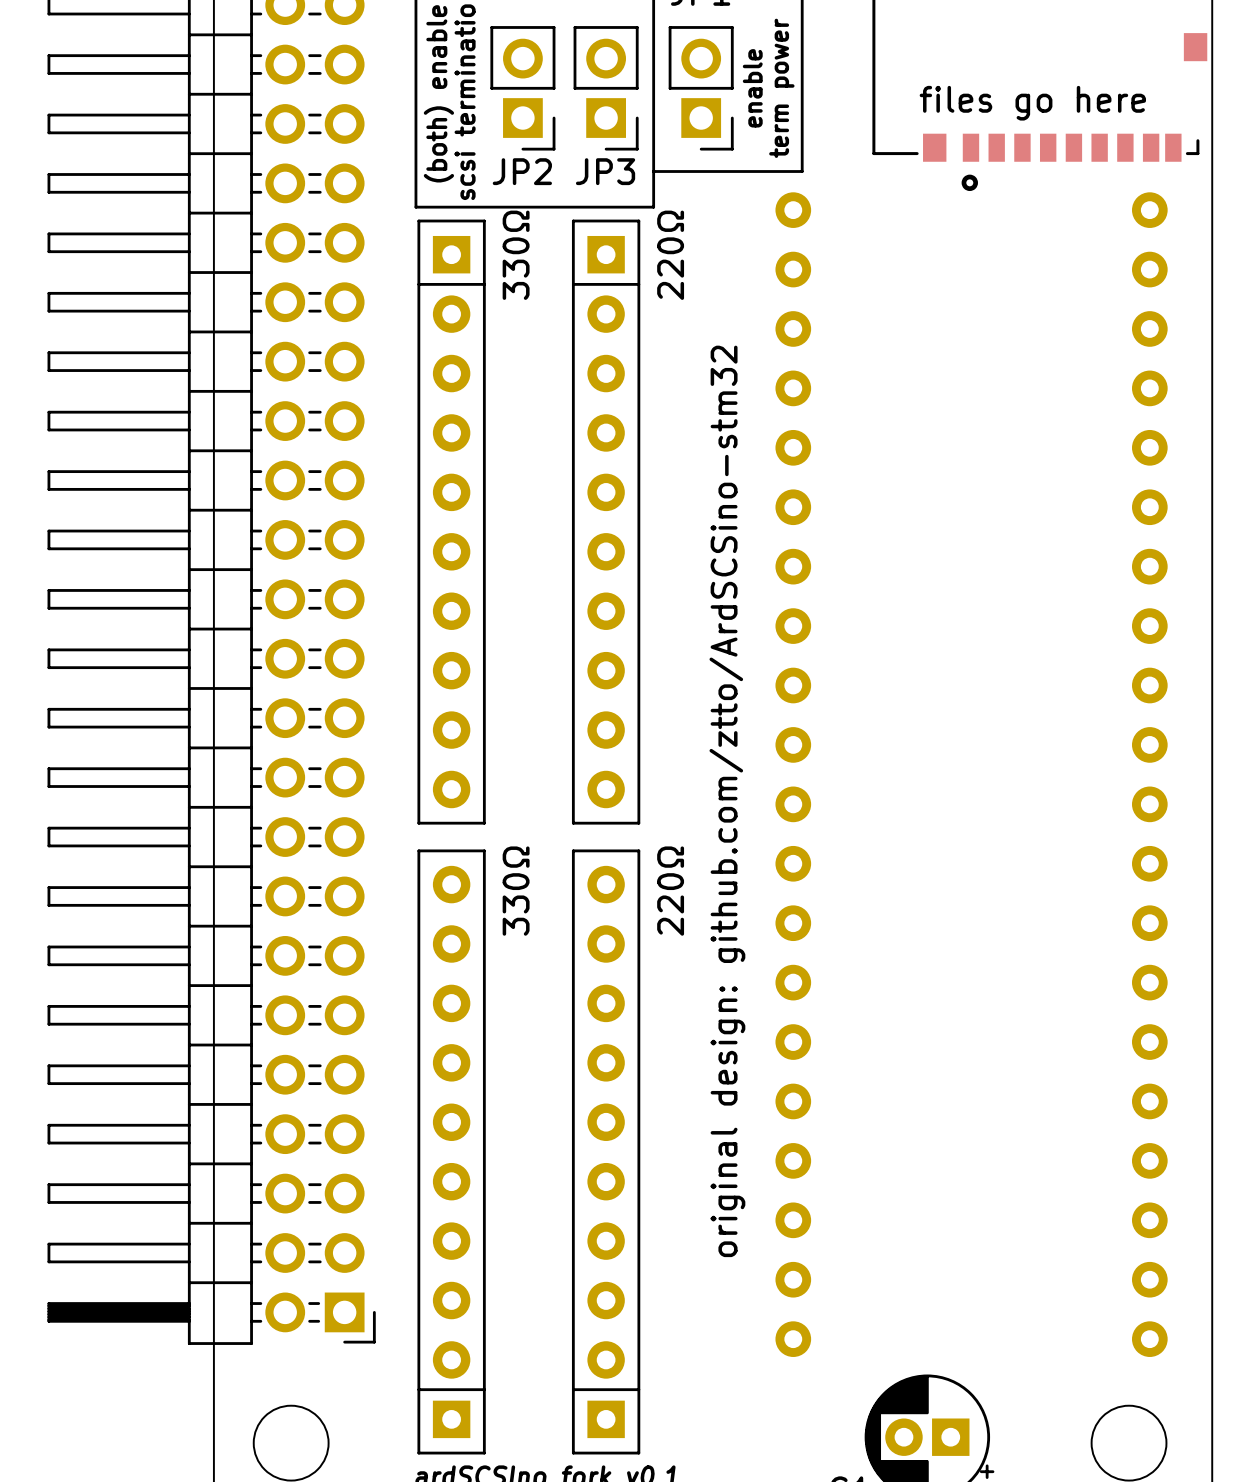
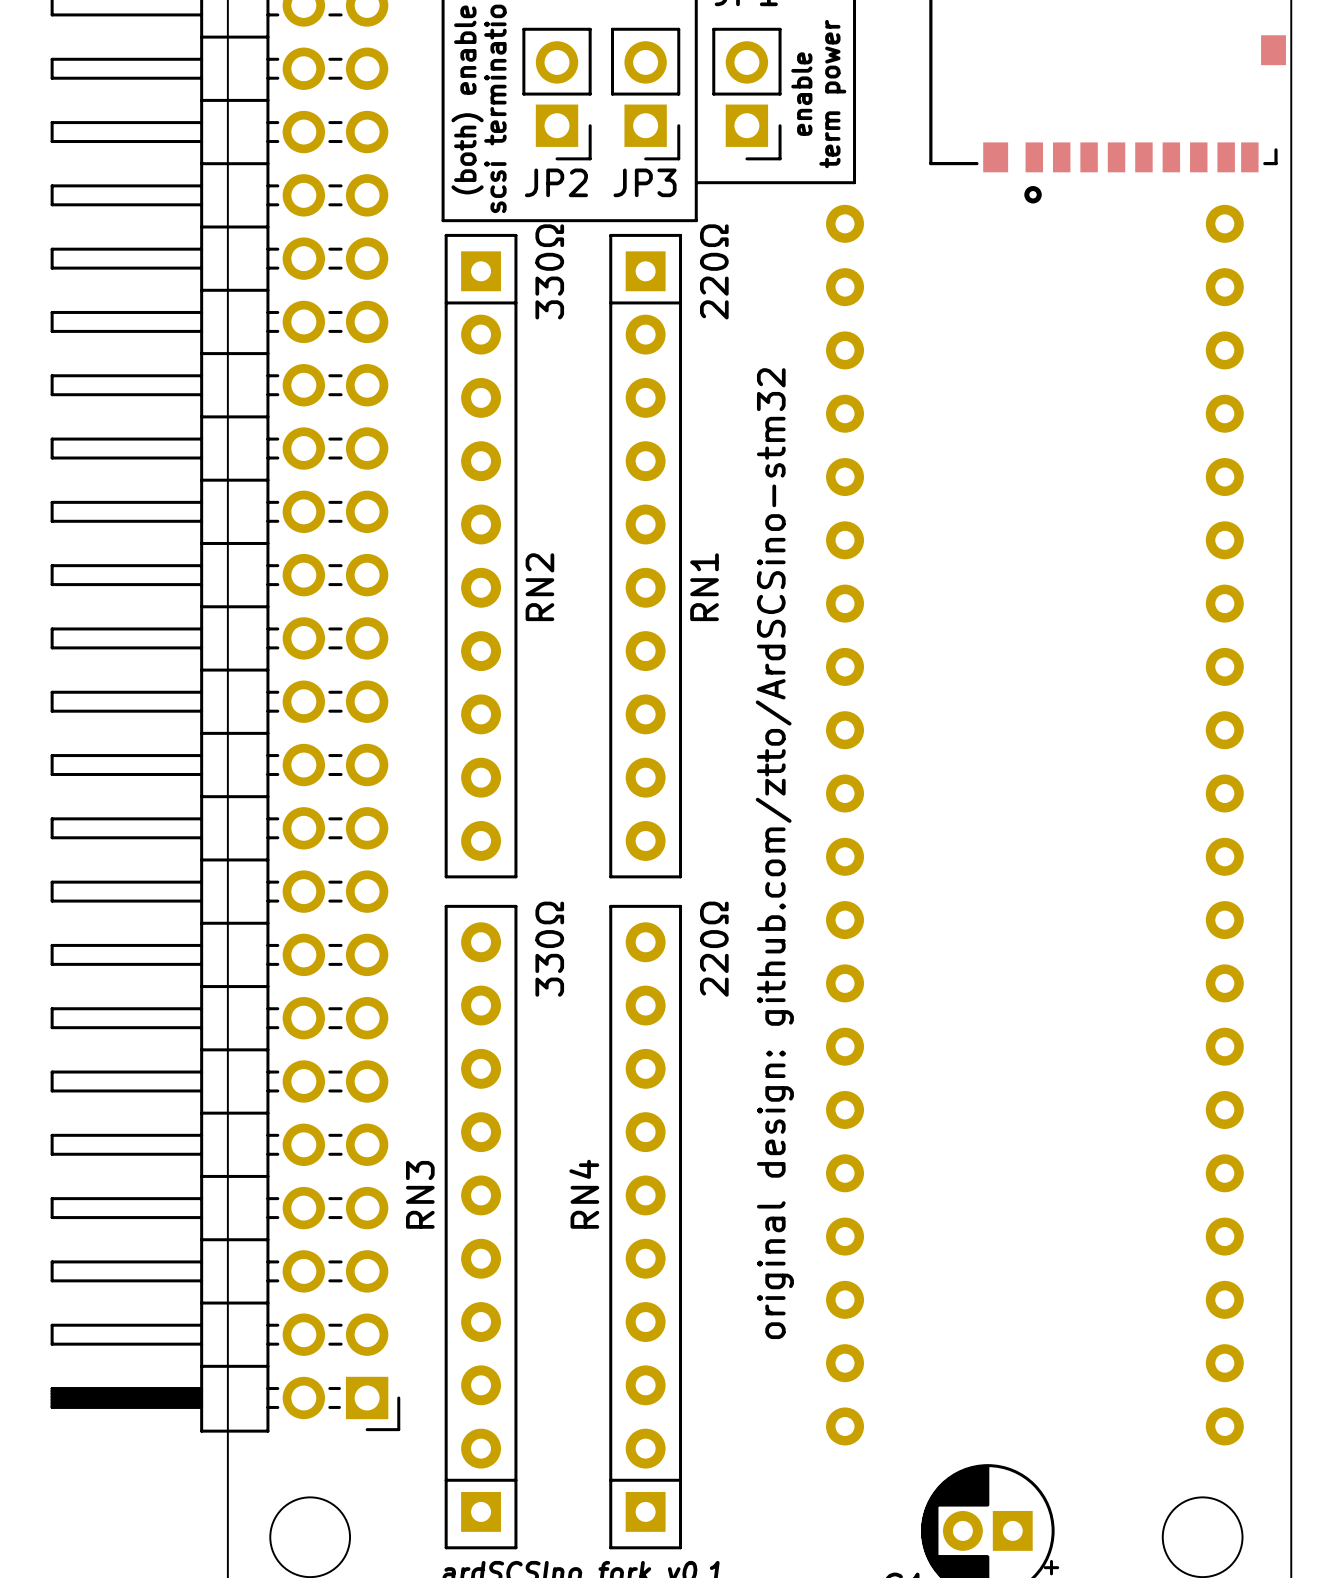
text: files go here (1032, 103) -> none
RN2 name: none -> RN2 (539, 587)
RN1 name: none -> RN1 (704, 587)
RN3 name: none -> RN3 (420, 1194)
RN4 name: none -> RN4 (584, 1194)

